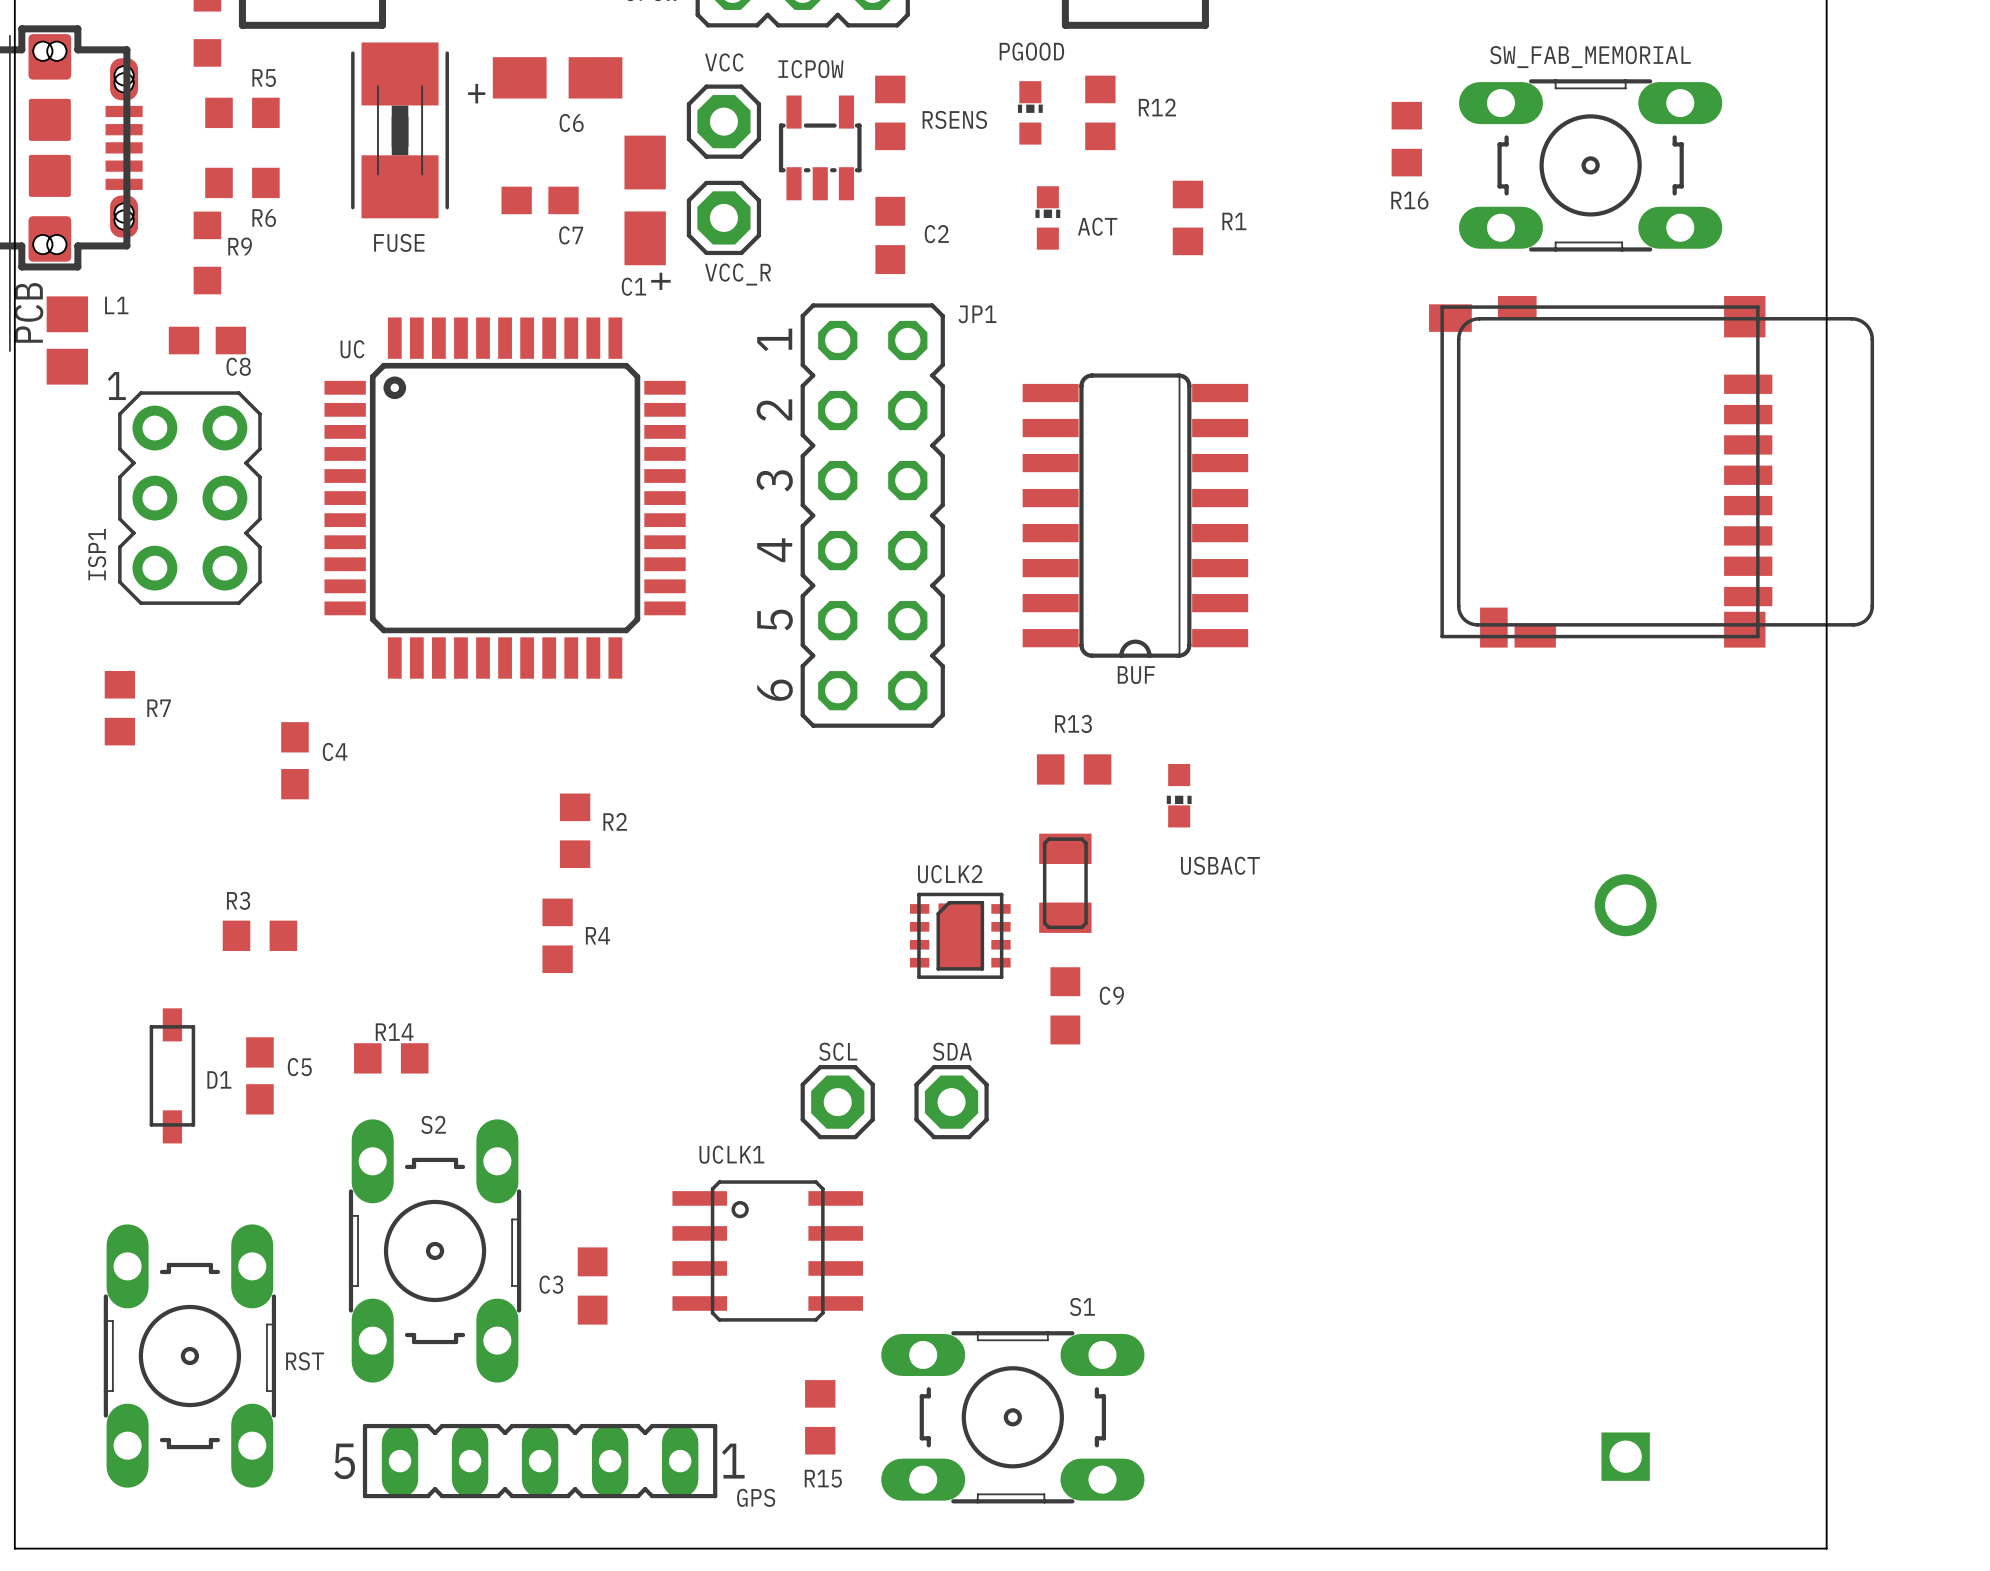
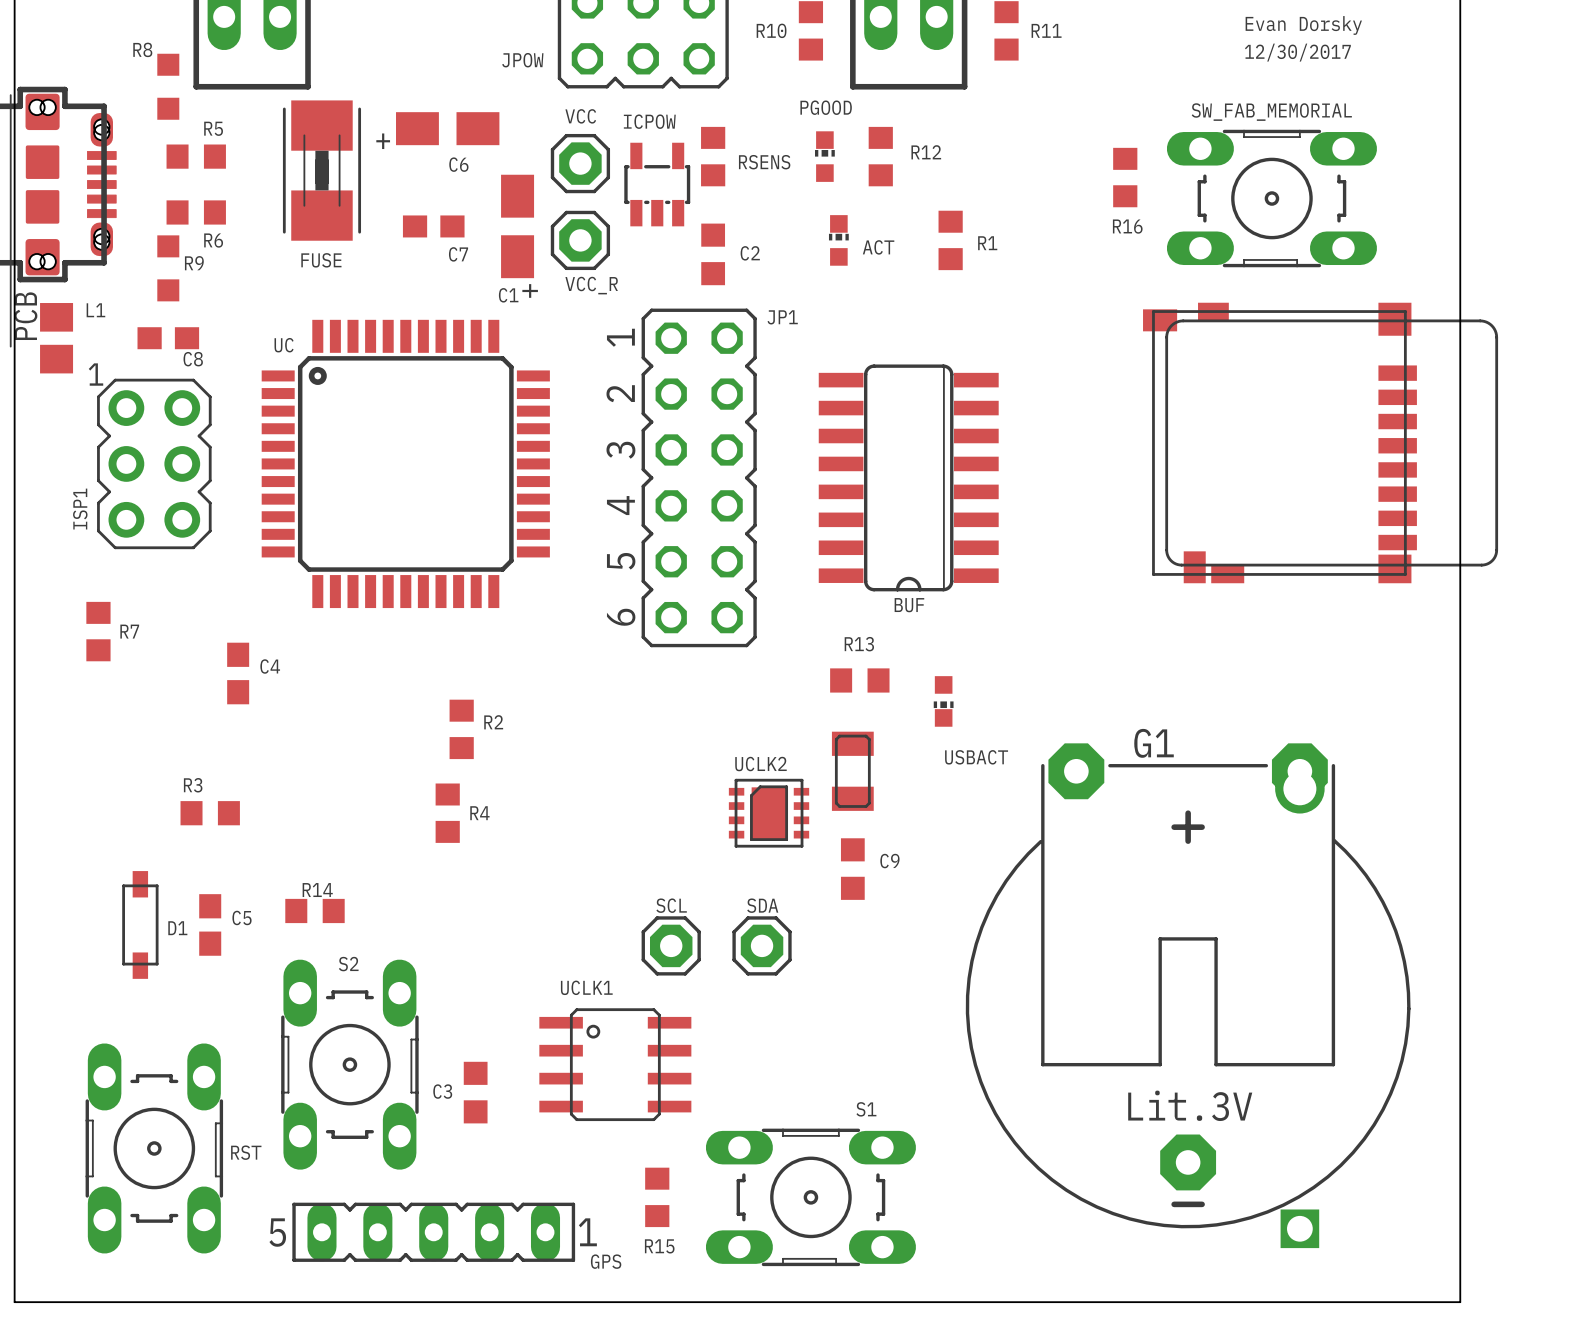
G1: none -> (1188, 985)

